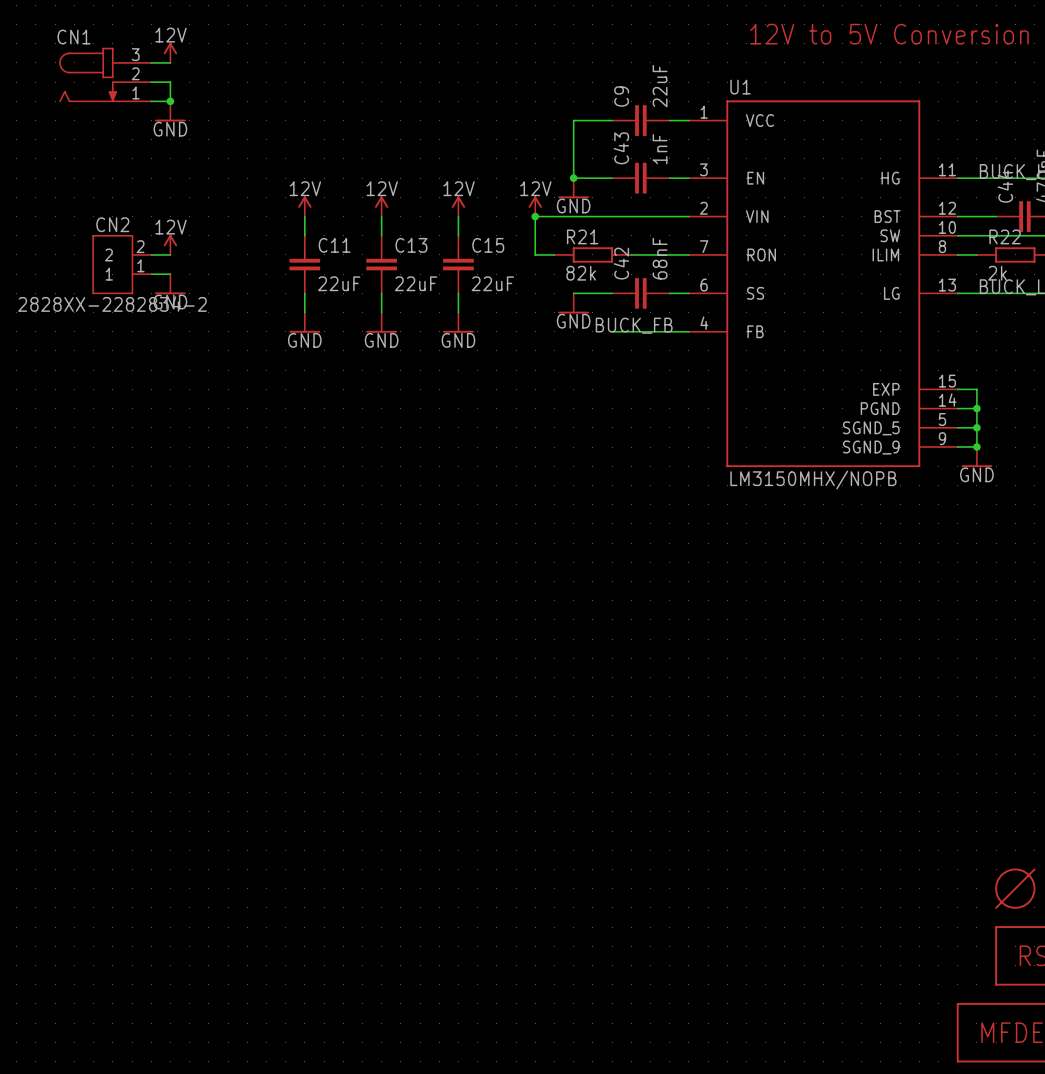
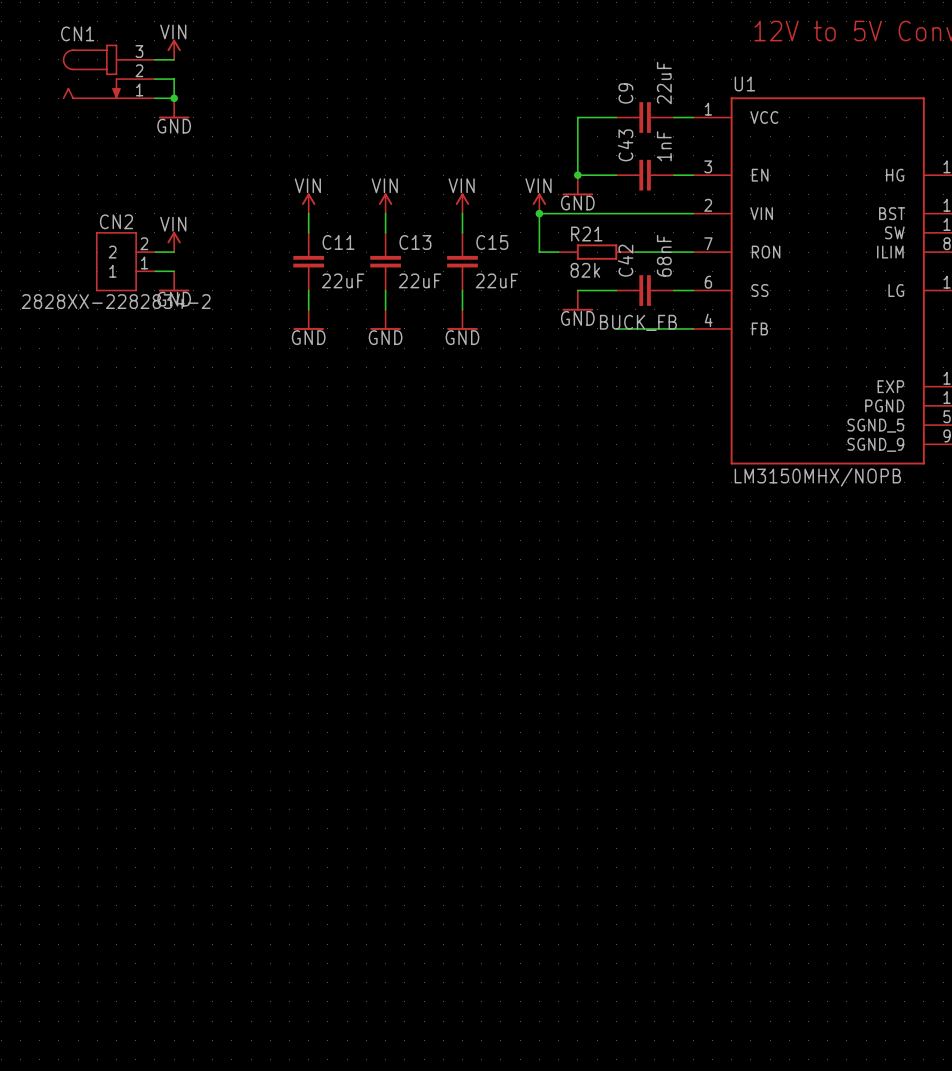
power symbol: 12V (170, 52) -> VIN (174, 49)
power symbol: 12V (304, 206) -> VIN (308, 203)
power symbol: 12V (381, 206) -> VIN (385, 203)
power symbol: 12V (458, 206) -> VIN (462, 203)
power symbol: 12V (535, 206) -> VIN (539, 203)
power symbol: 12V (170, 244) -> VIN (174, 241)

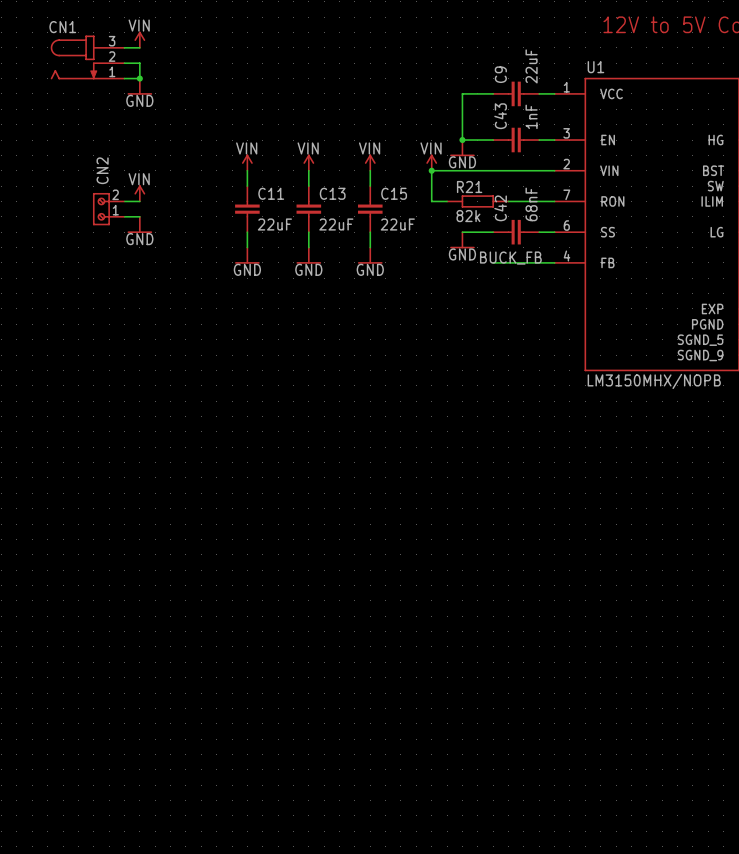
CN2 symbol: [96, 232, 156, 292] -> [92, 193, 125, 226]
CN2 value: 2828XX-2282834-2 (116, 301) -> none

